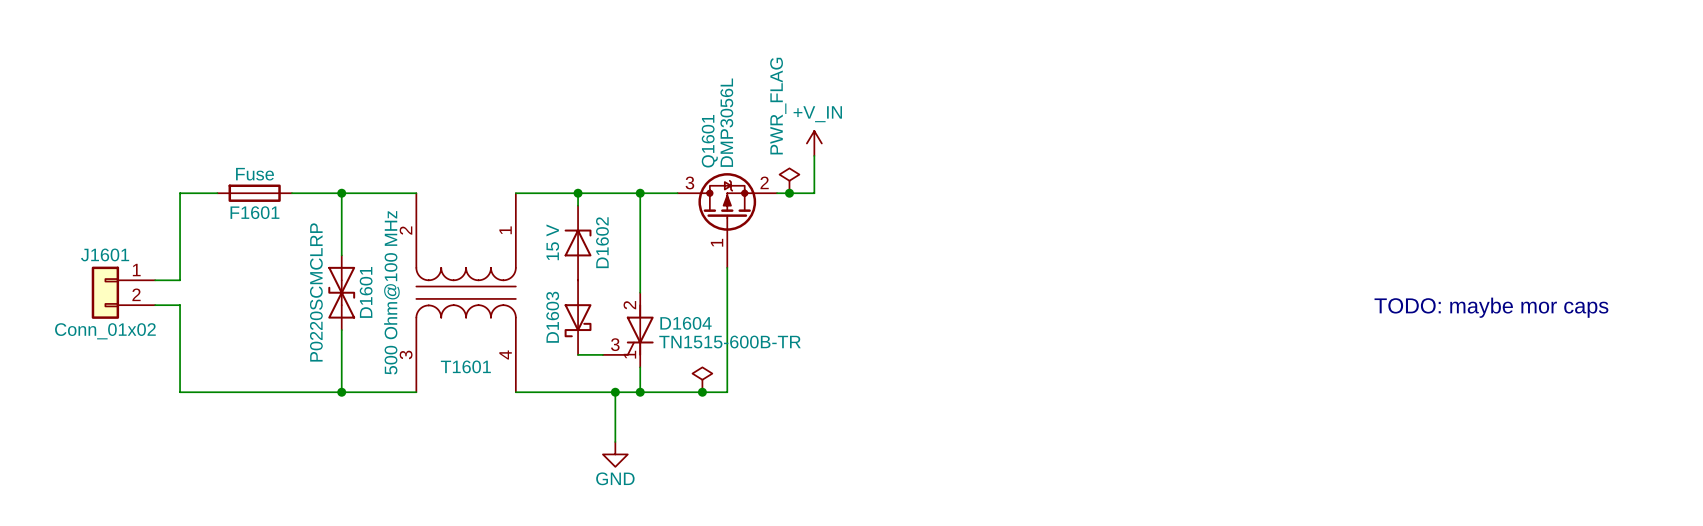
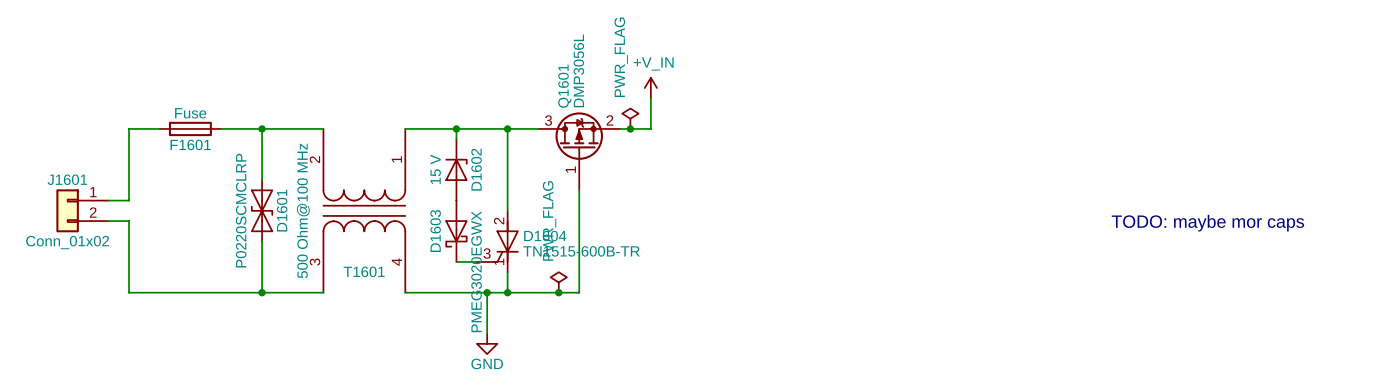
power symbol text: none -> PWR_FLAG (549, 221)
D1603 value: none -> PMEG3020EGWX (476, 271)

